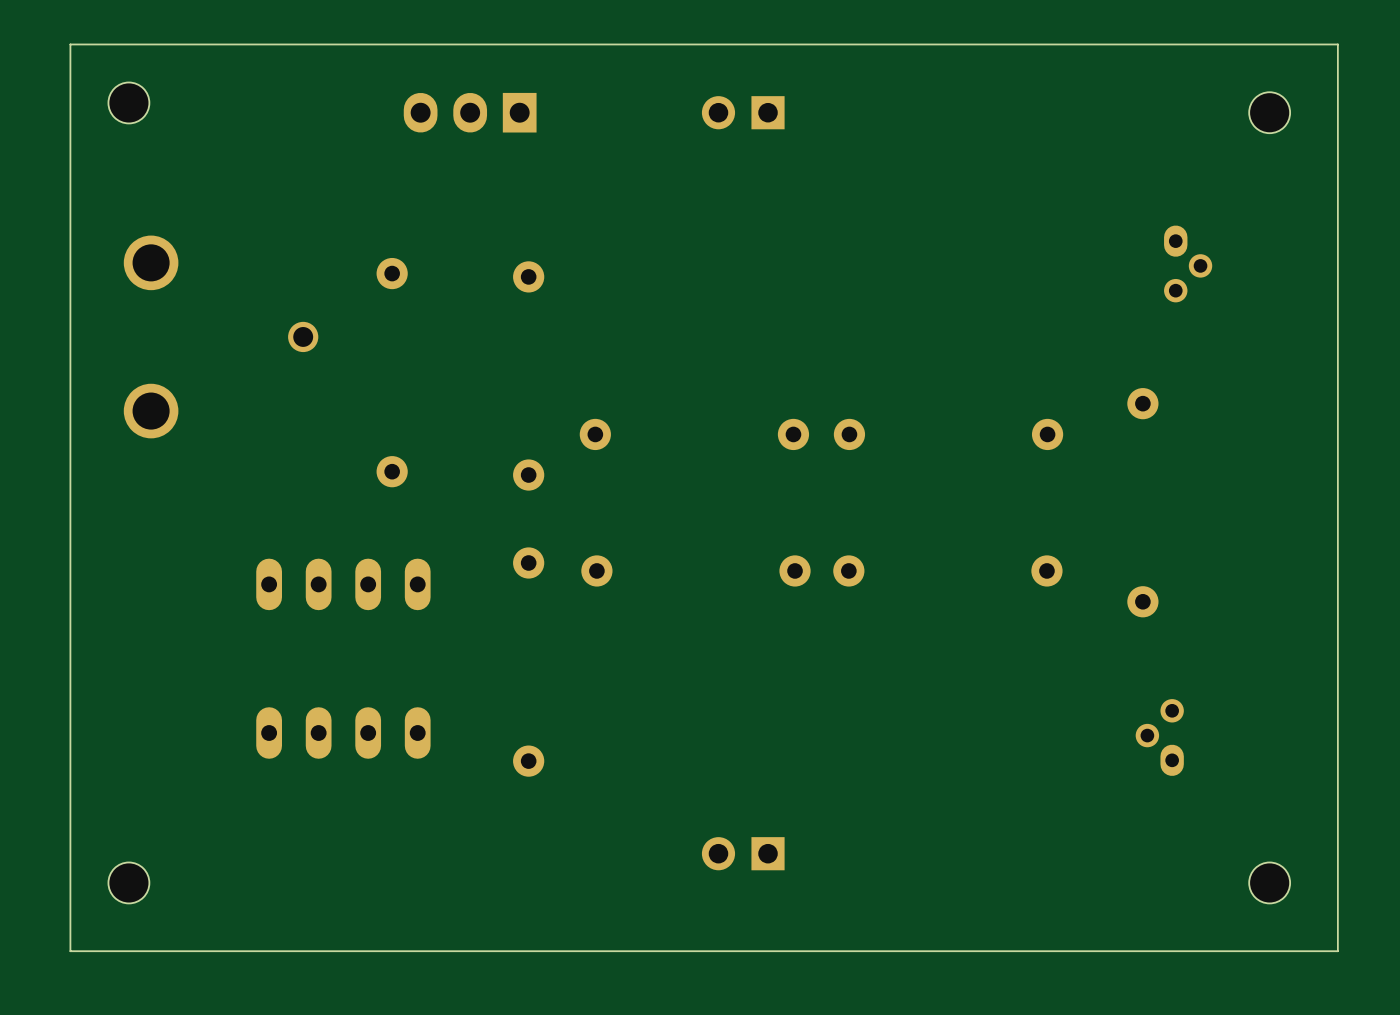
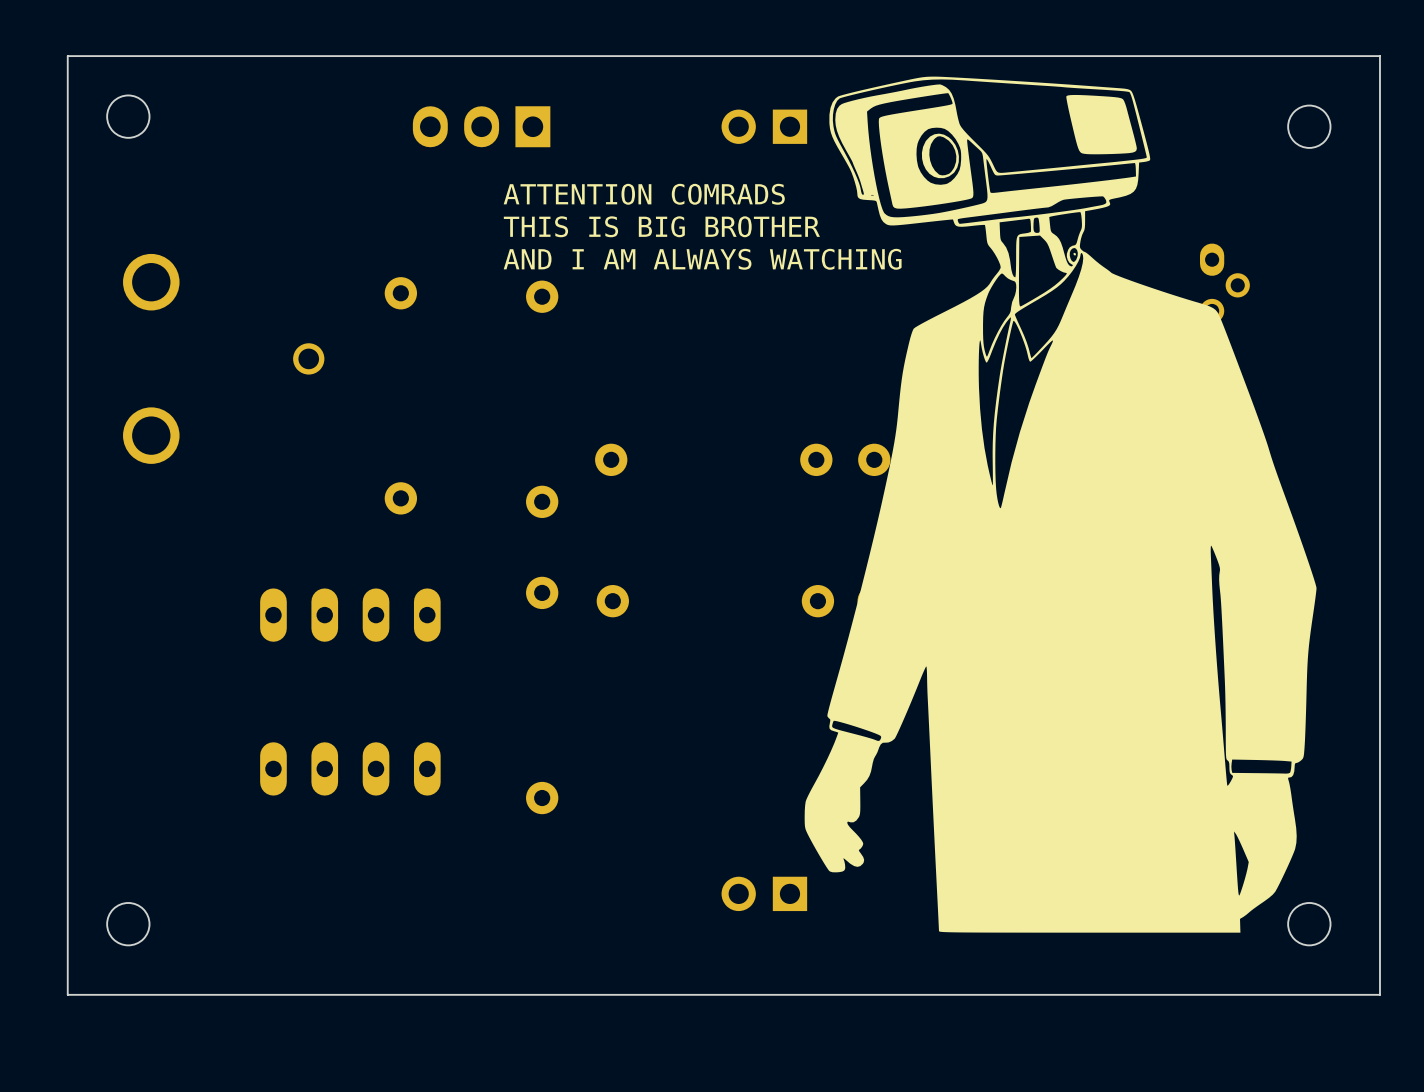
text: none -> ATTENTION COMRADS (644, 194)
text: none -> THIS IS BIG BROTHER (661, 226)
text: none -> AND I AM ALWAYS WATCHING (702, 259)
part: none -> (1060, 504)

